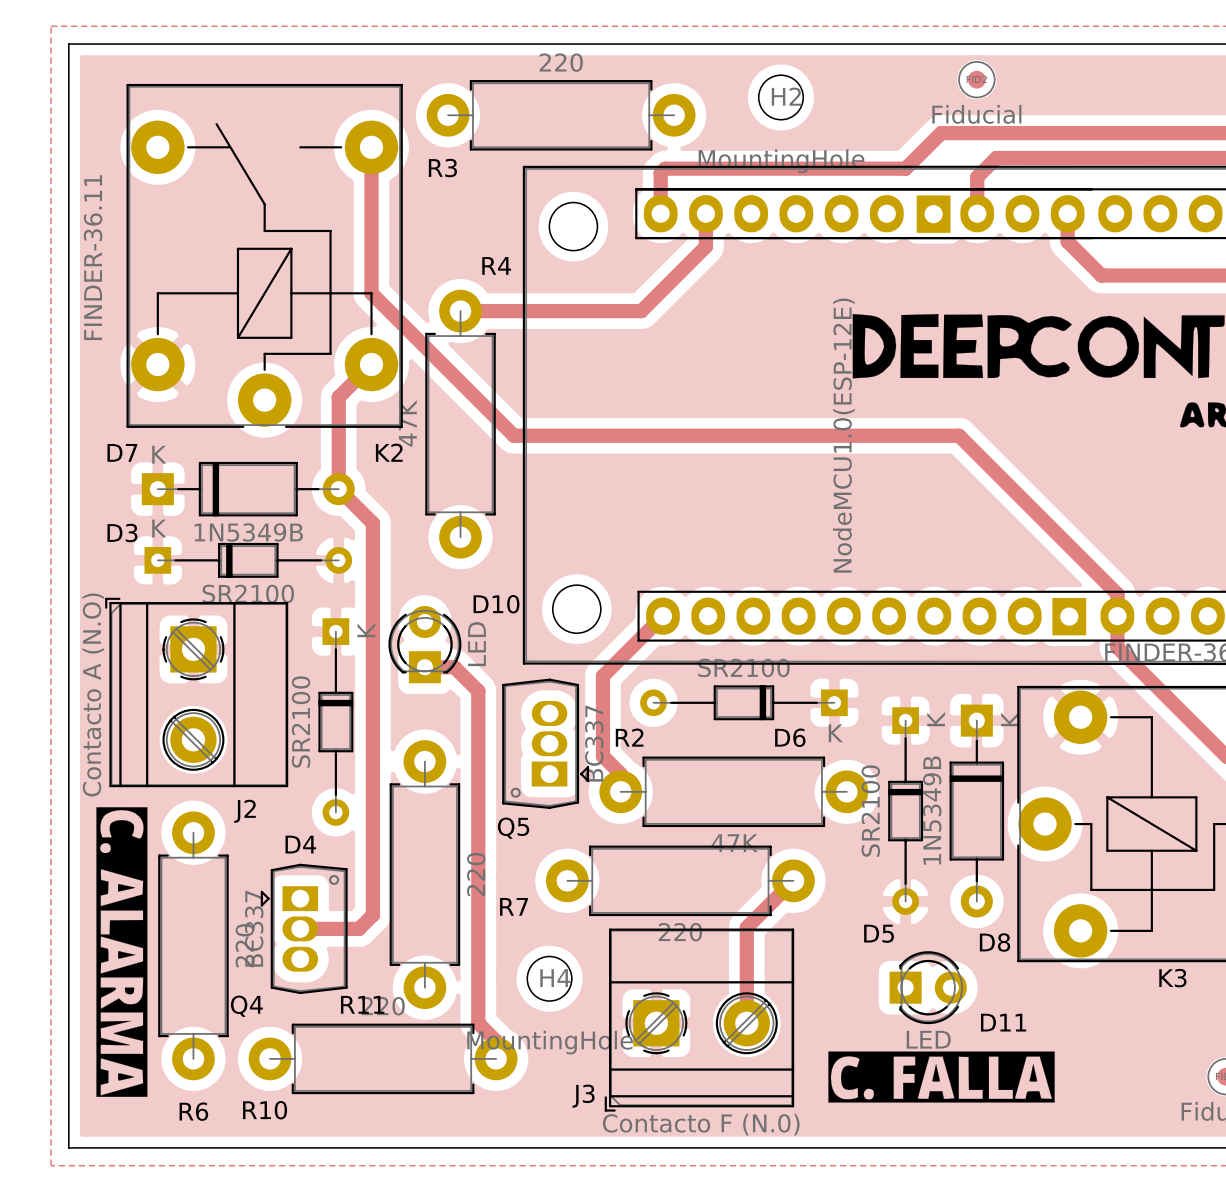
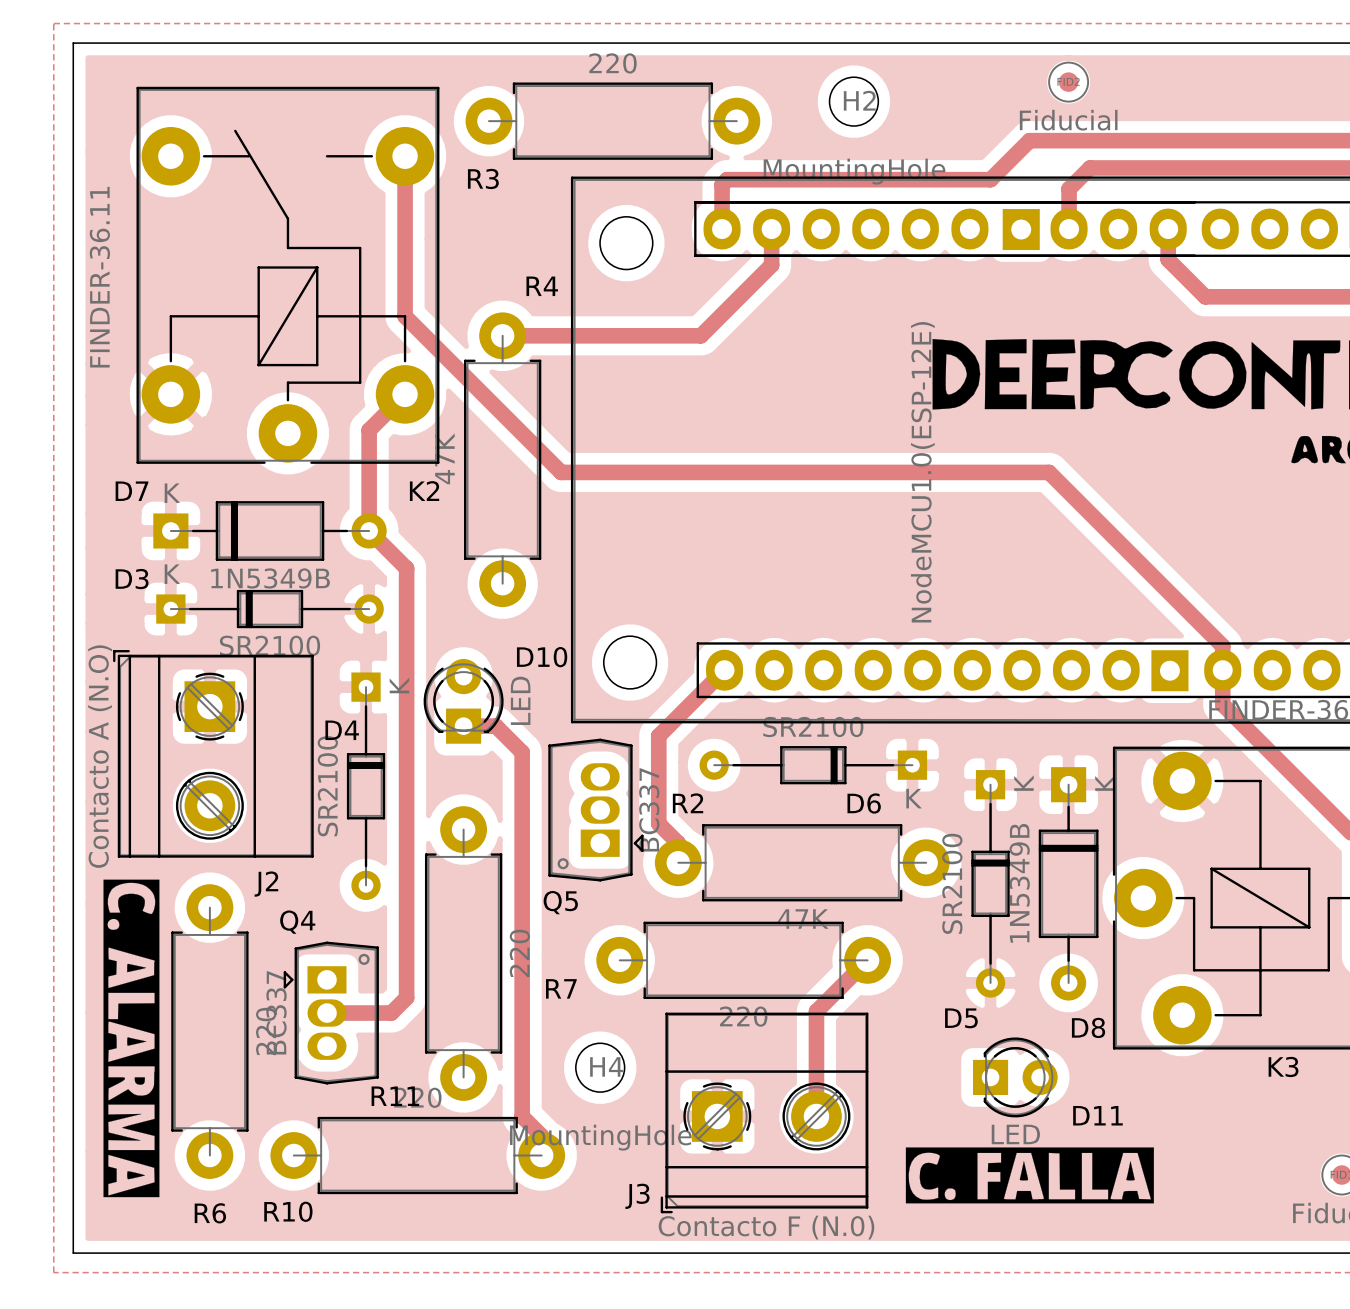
D4 name position: D4 (300, 844) -> D4 (342, 730)
Q4 name position: Q4 (246, 1006) -> Q4 (297, 922)

